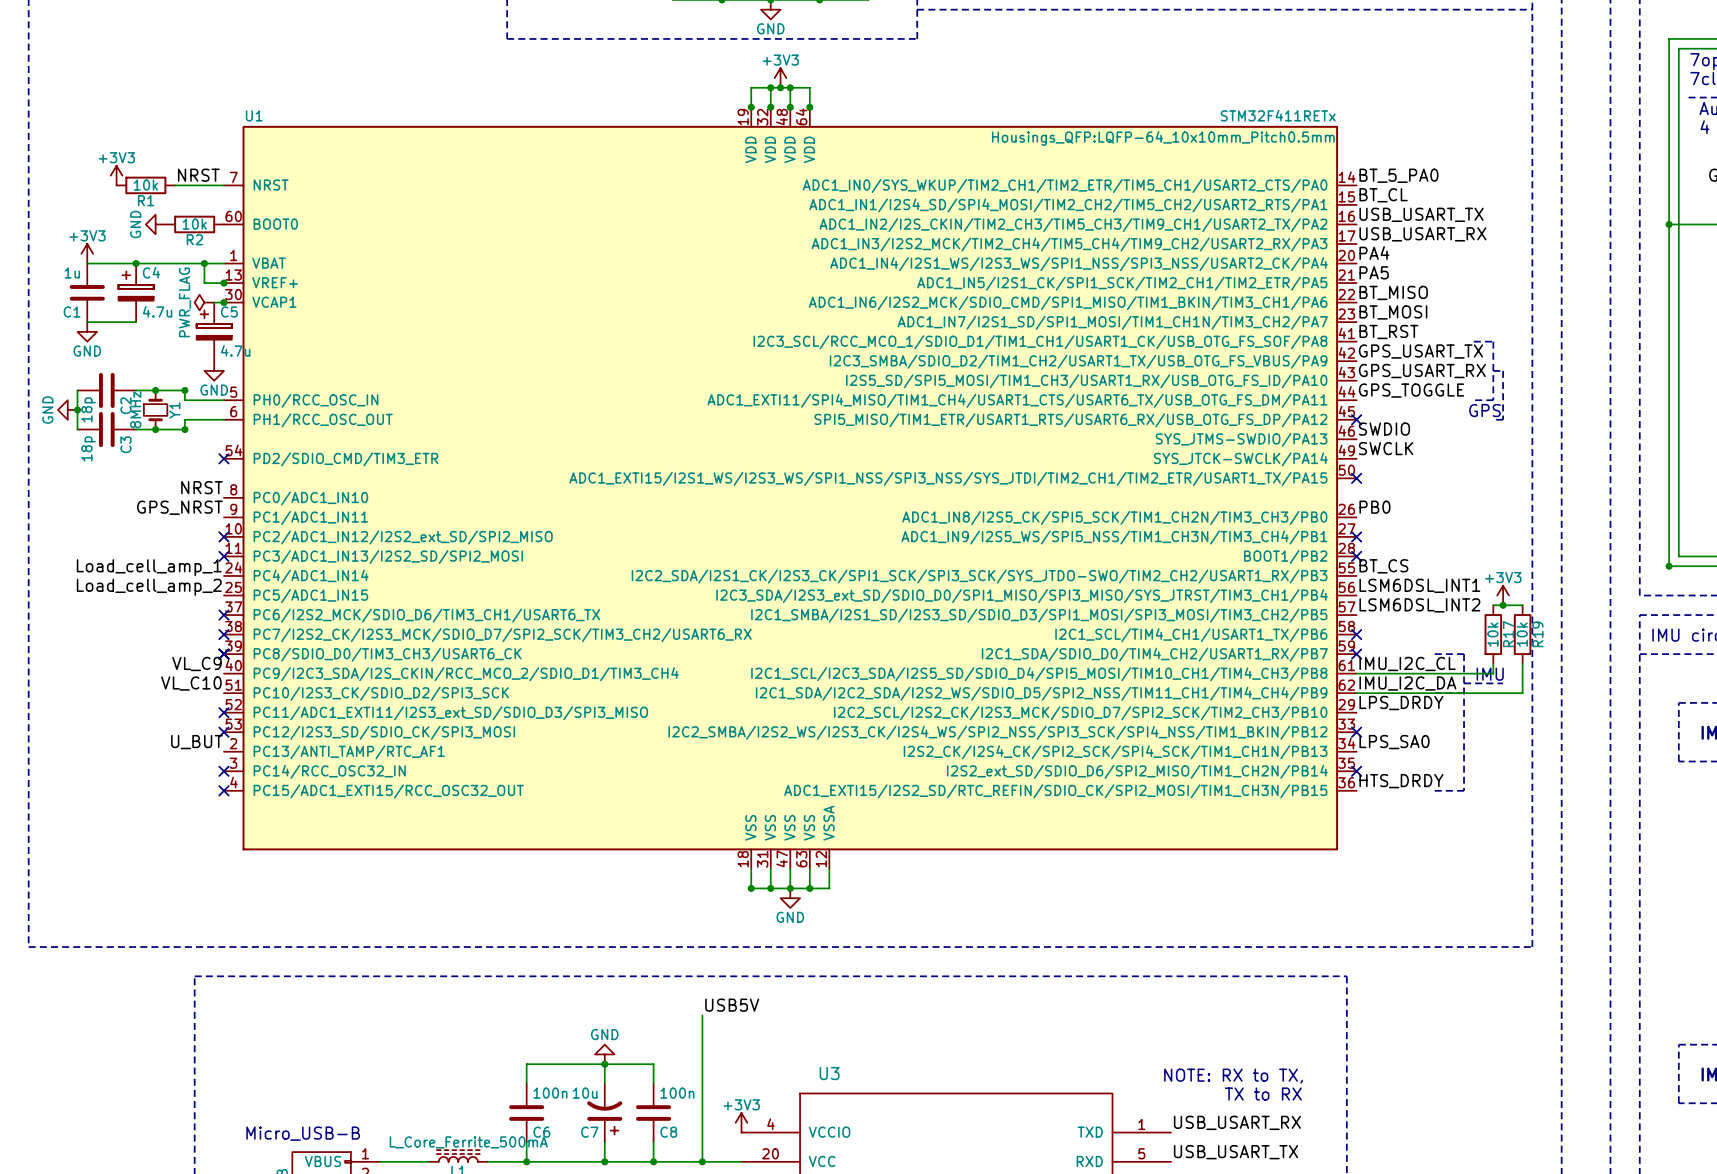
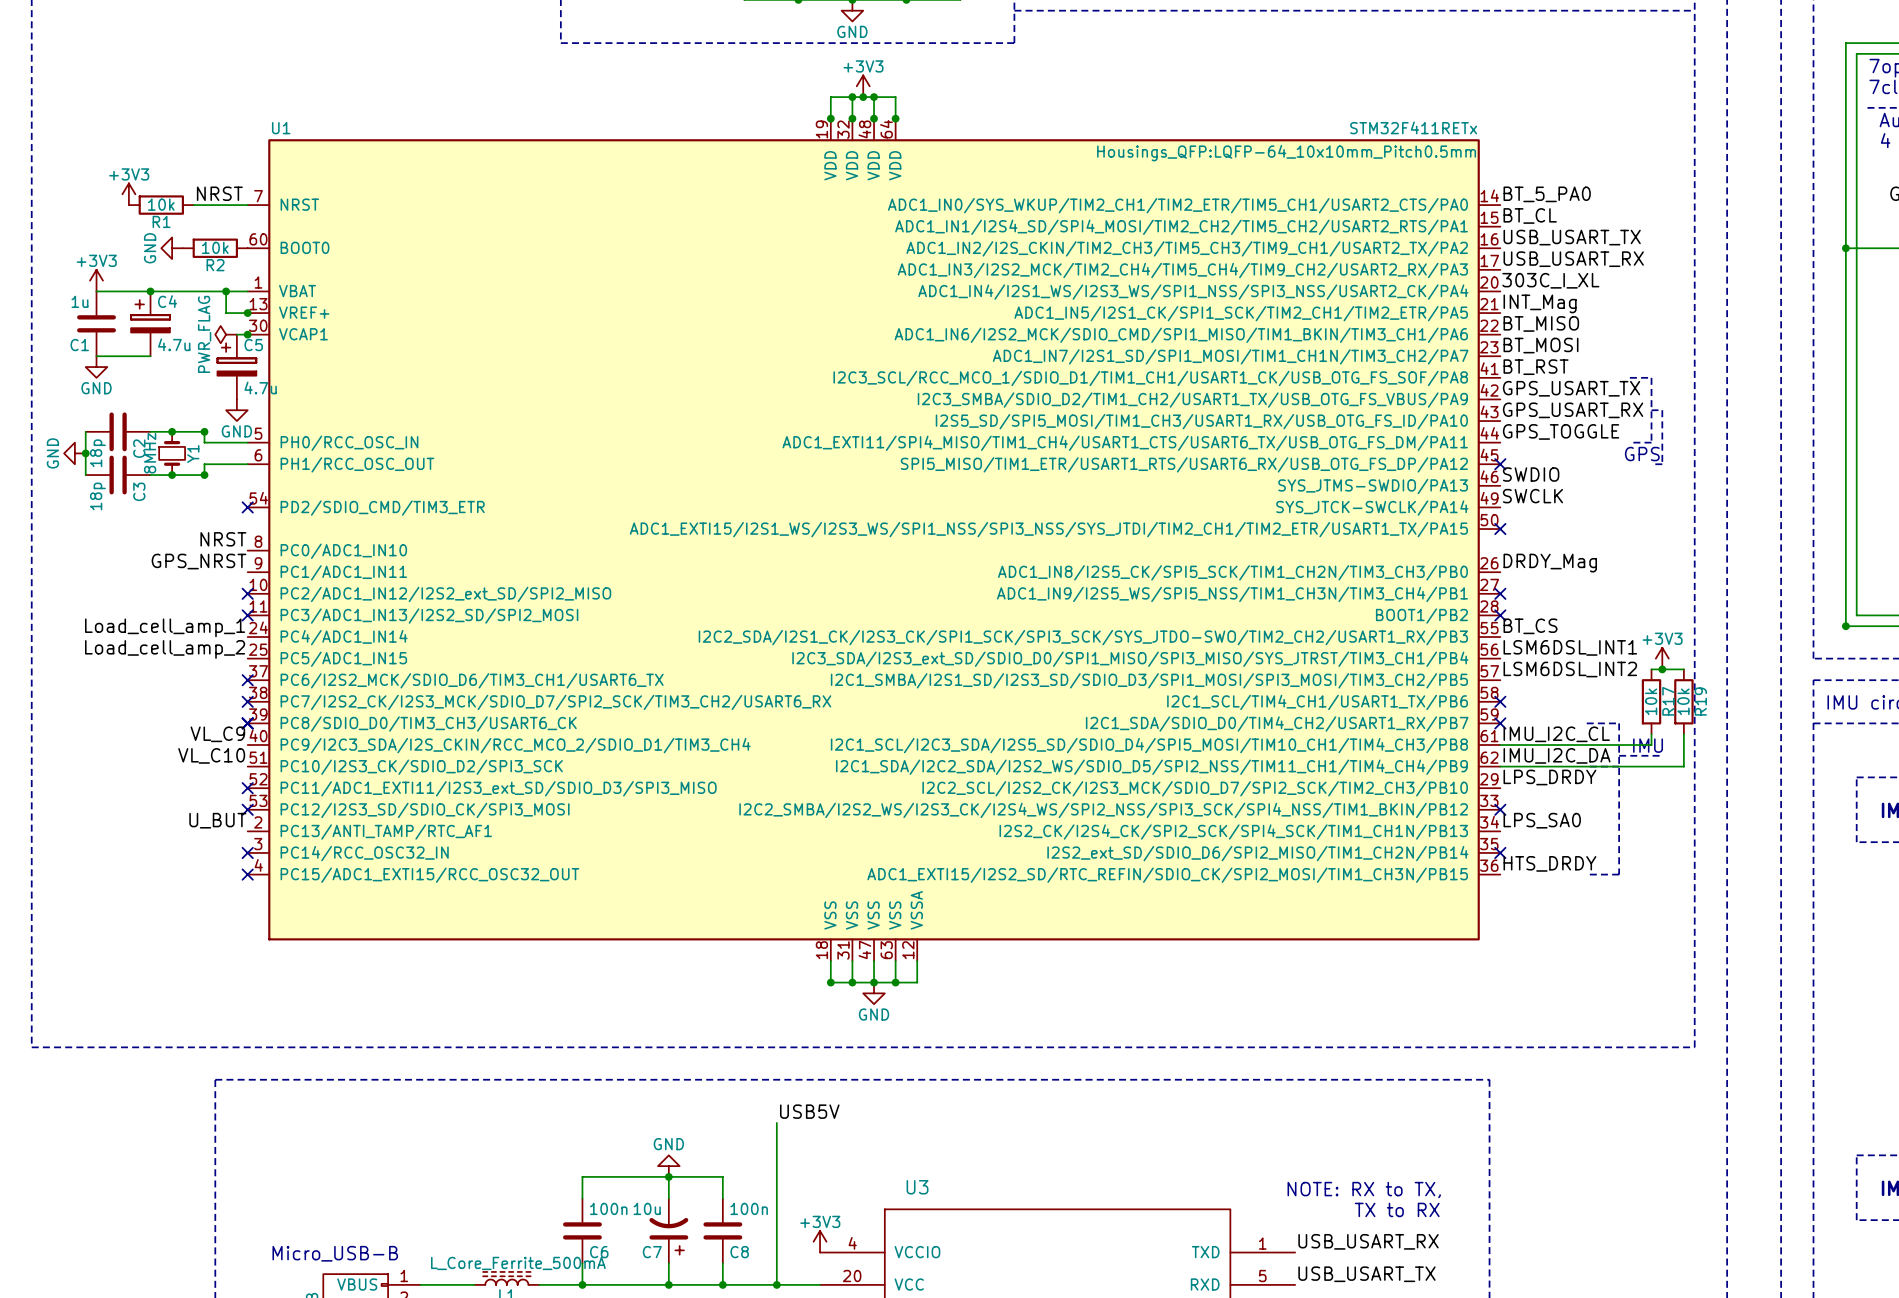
label: PA4 (1374, 253) -> 303C_I_XL (1550, 280)
label: PA5 (1374, 272) -> INT_Mag (1540, 303)
label: PB0 (1374, 507) -> DRDY_Mag (1550, 563)

